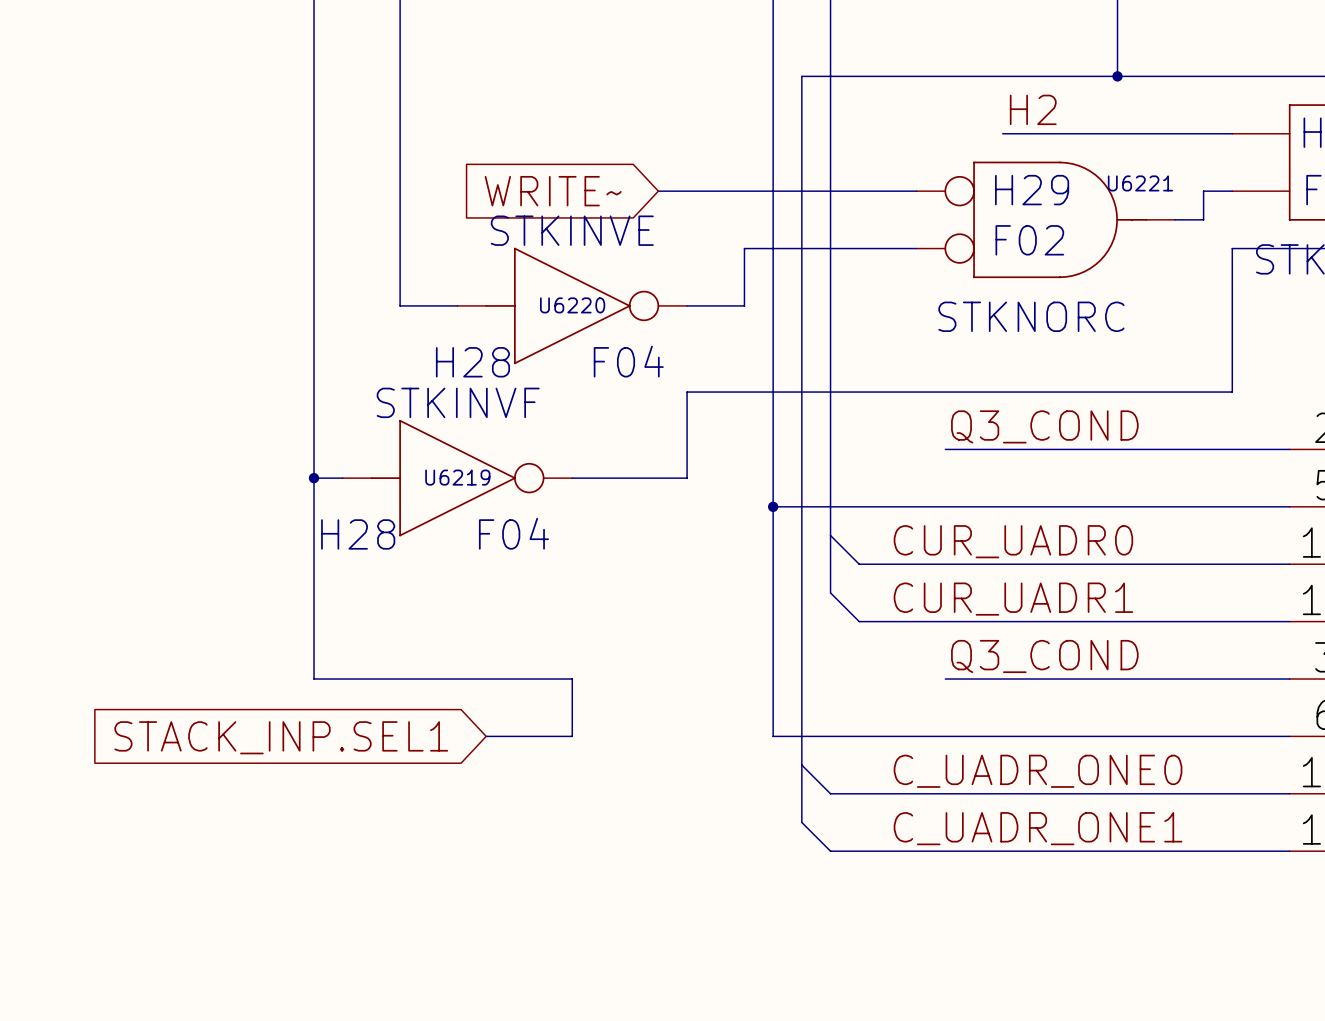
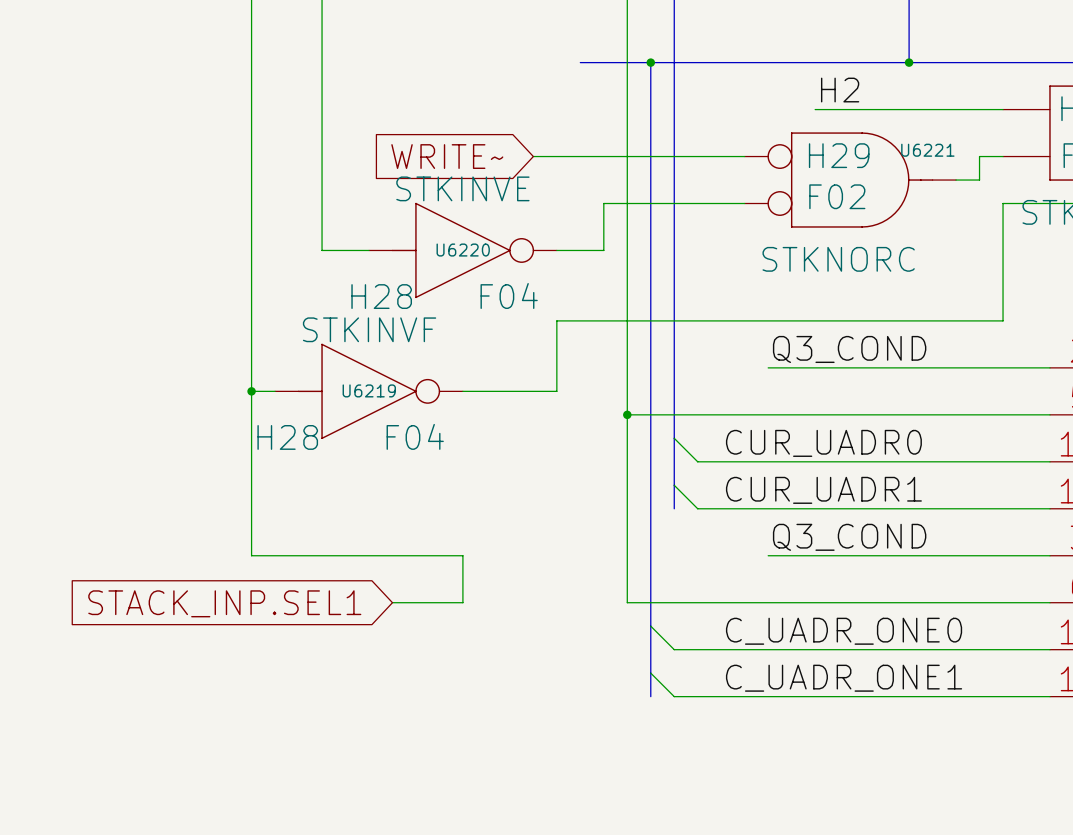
bus: none -> (580, 62) (650, 62)
junction: none -> (650, 62)
bus: none -> (674, 485) (674, 508)
bus: none -> (650, 673) (650, 696)

